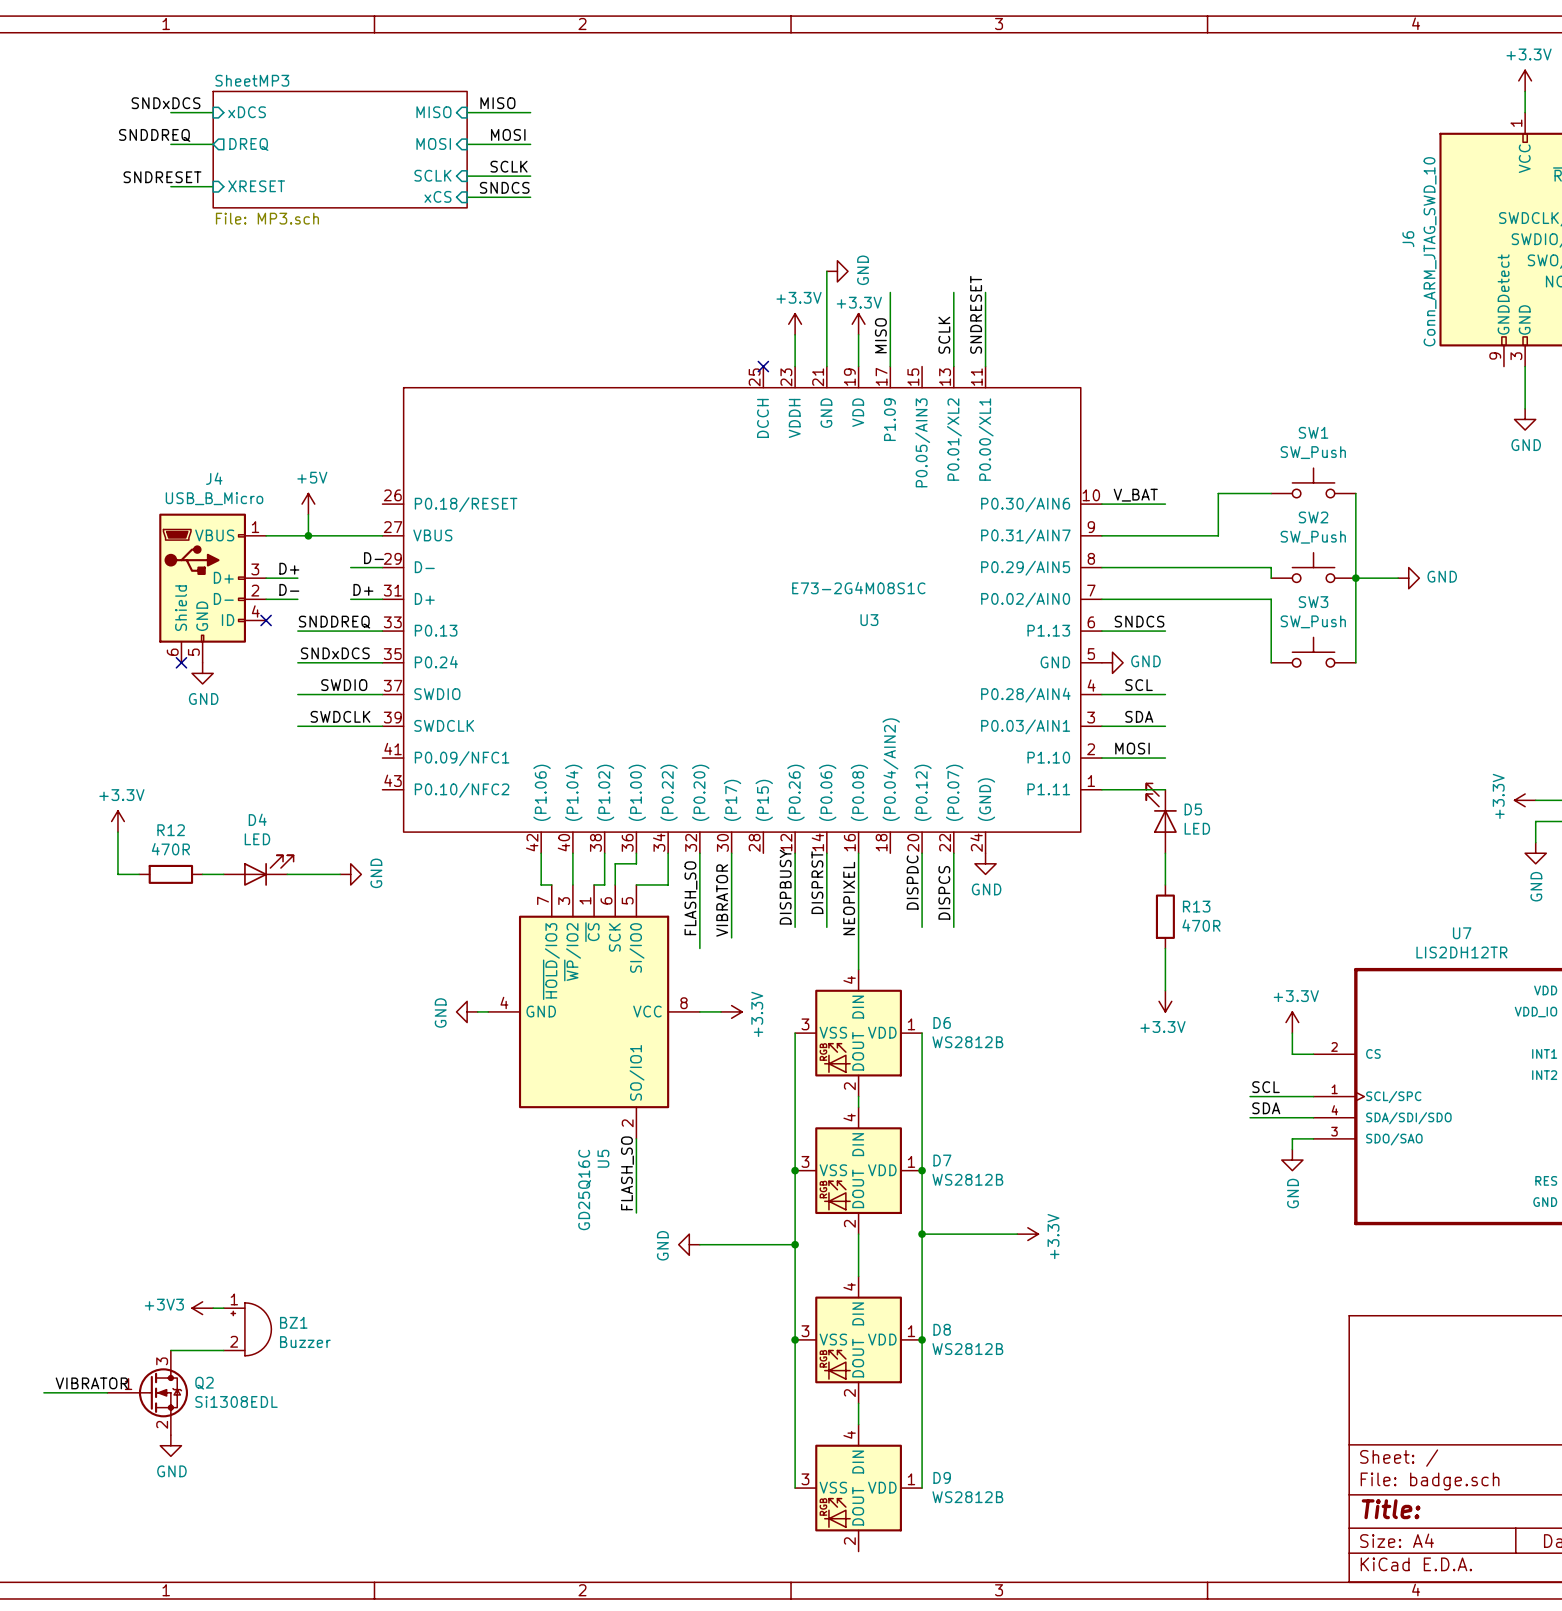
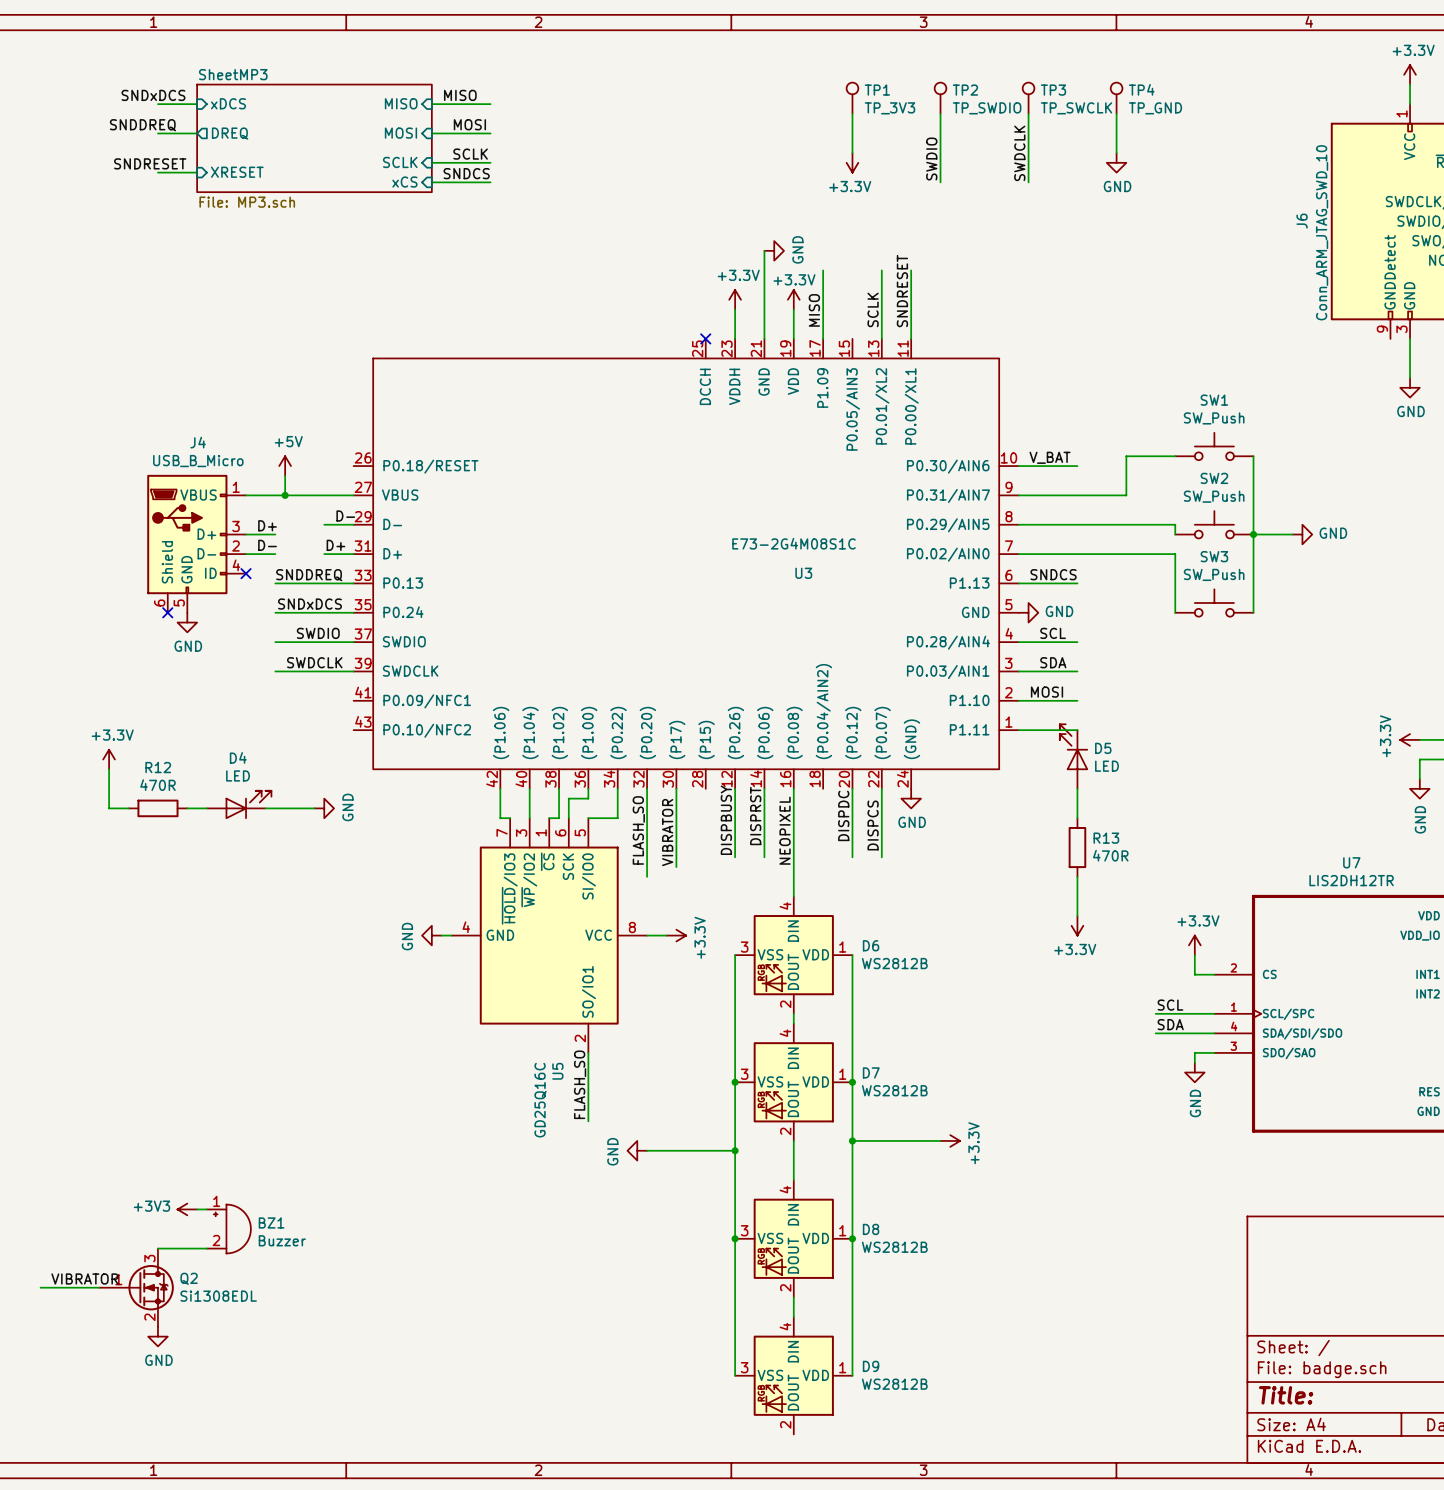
TP1: none -> TP_3V3 (852, 98)
TP2: none -> TP_SWDIO (940, 98)
TP3: none -> TP_SWCLK (1028, 98)
TP4: none -> TP_GND (1116, 98)
wire: none -> (852, 113) (852, 153)
wire: none -> (940, 113) (940, 182)
wire: none -> (1028, 113) (1028, 182)
wire: none -> (1116, 113) (1116, 153)
label: none -> SWDCLK (1019, 153)
label: none -> SWDIO (931, 159)
power symbol: none -> +3.3V (852, 162)
power symbol: none -> GND (1116, 162)

